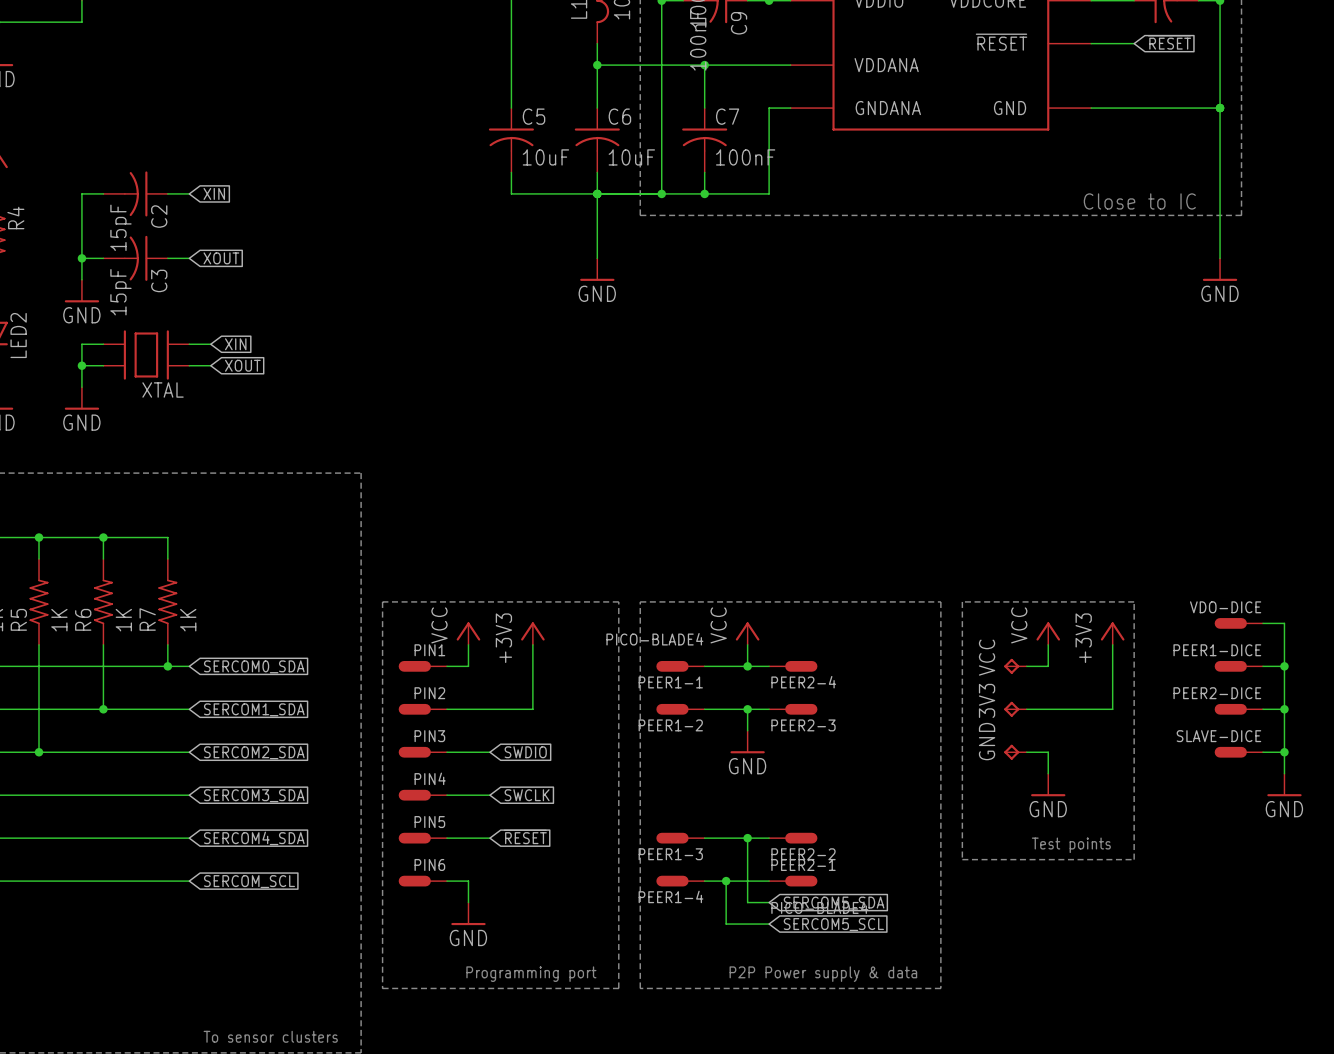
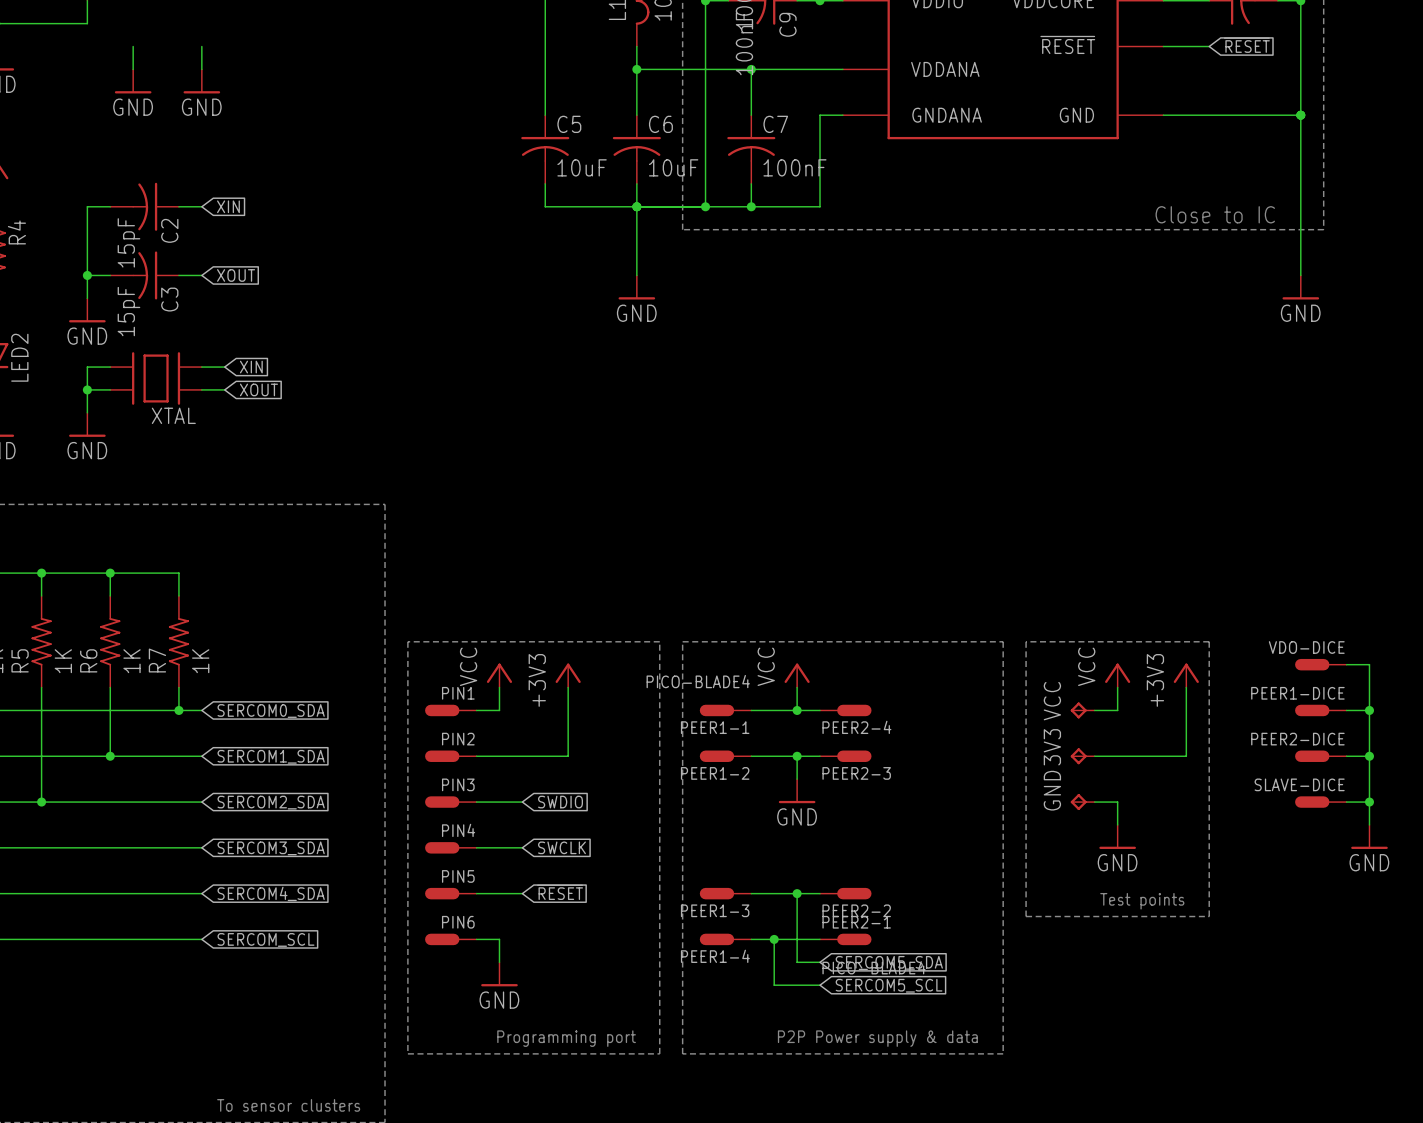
wire: none -> (133, 46) (133, 69)
wire: none -> (201, 46) (201, 69)
power symbol: none -> GND (133, 81)
power symbol: none -> GND (201, 81)

